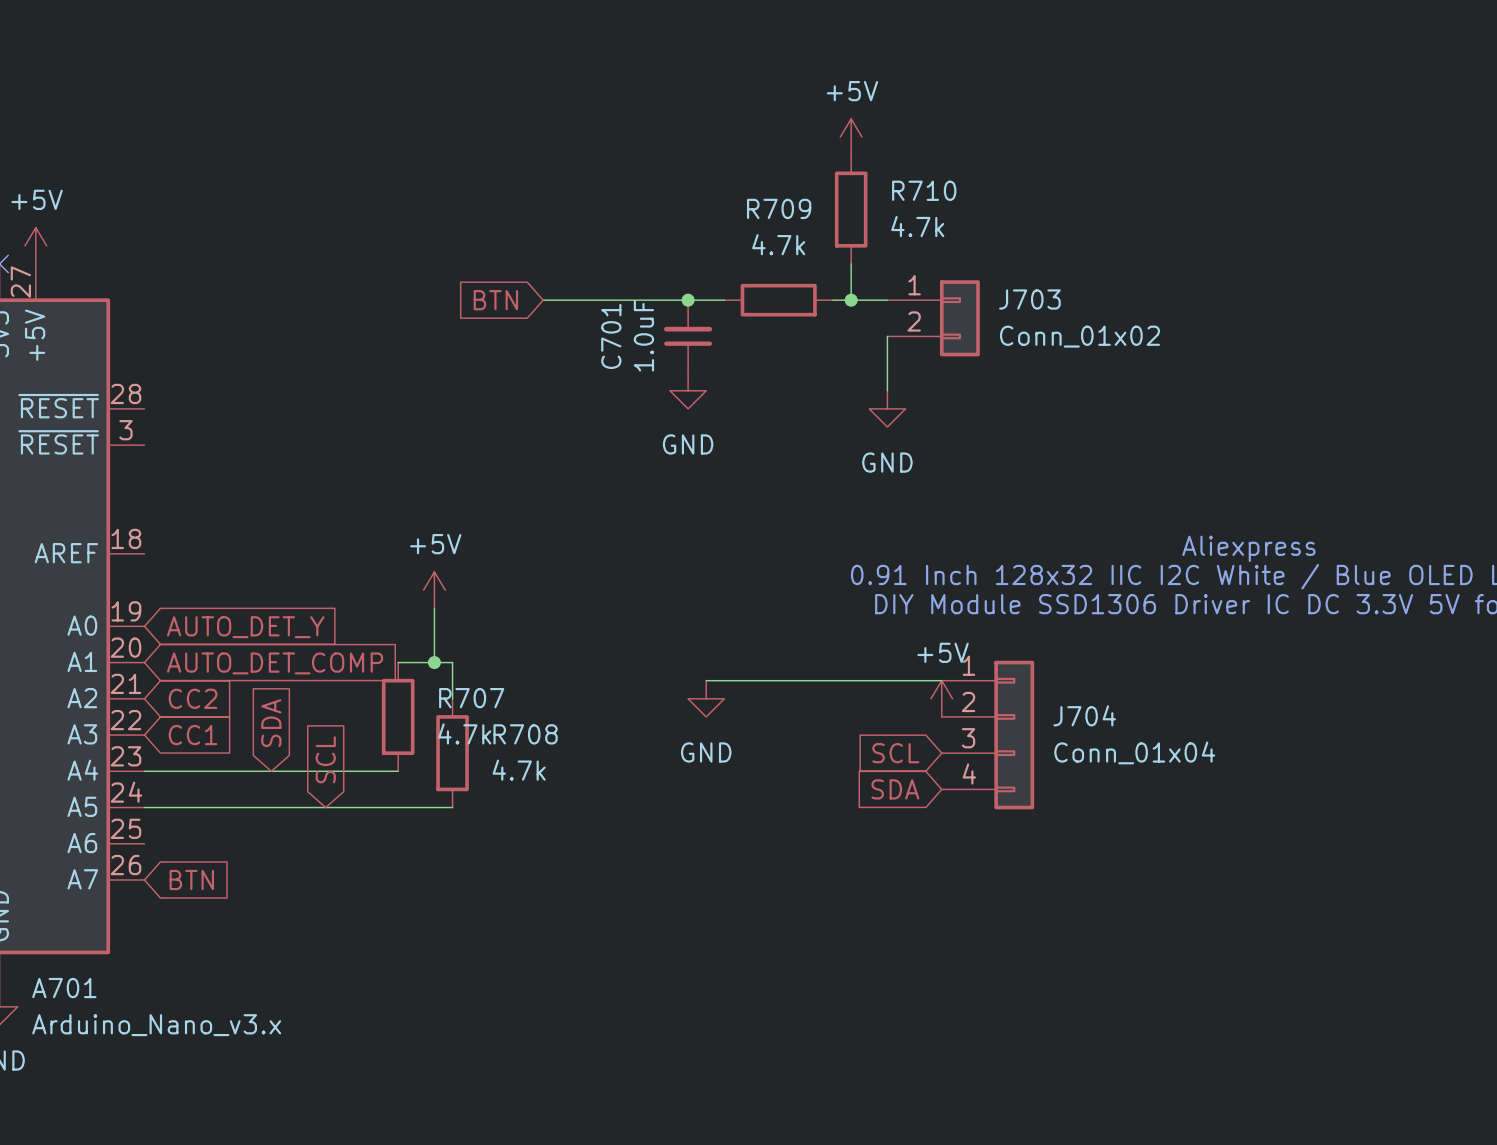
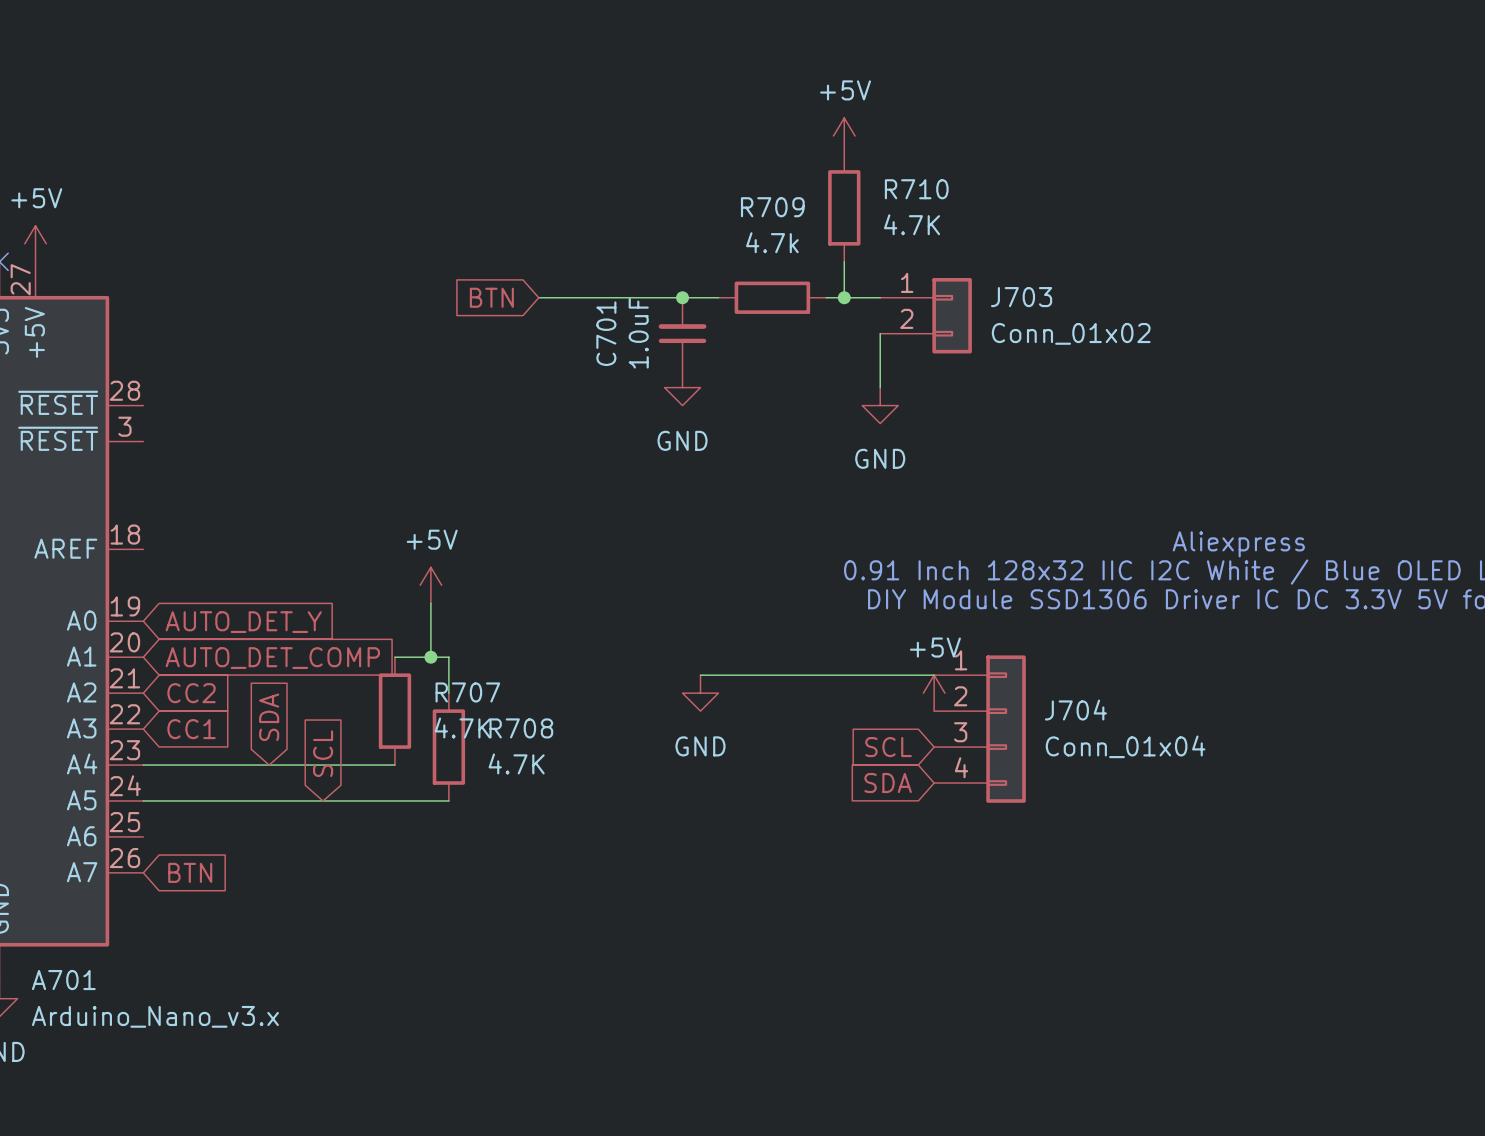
R710 value: 4.7k (917, 226) -> 4.7K (912, 224)
R707 value: 4.7k (464, 733) -> 4.7K (462, 727)
R708 value: 4.7k (519, 770) -> 4.7K (516, 763)

